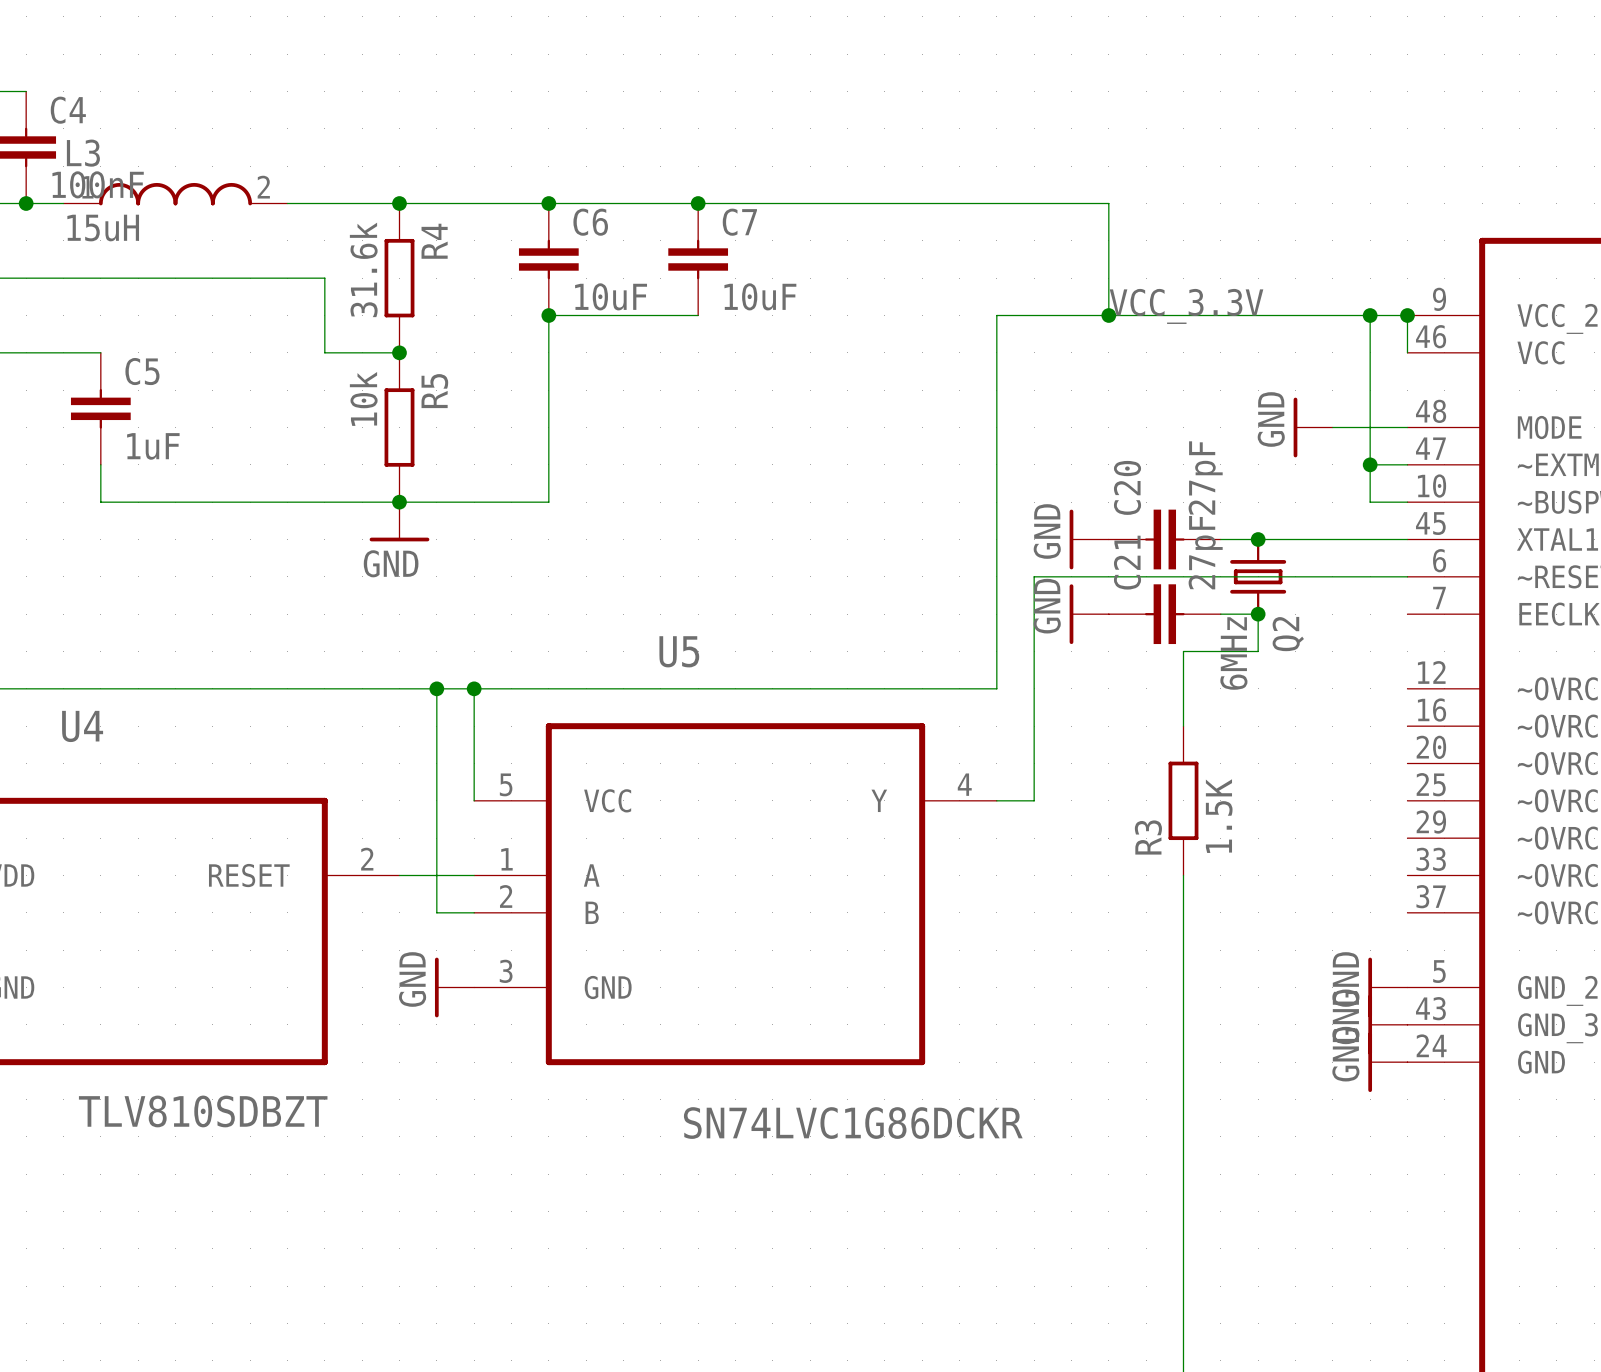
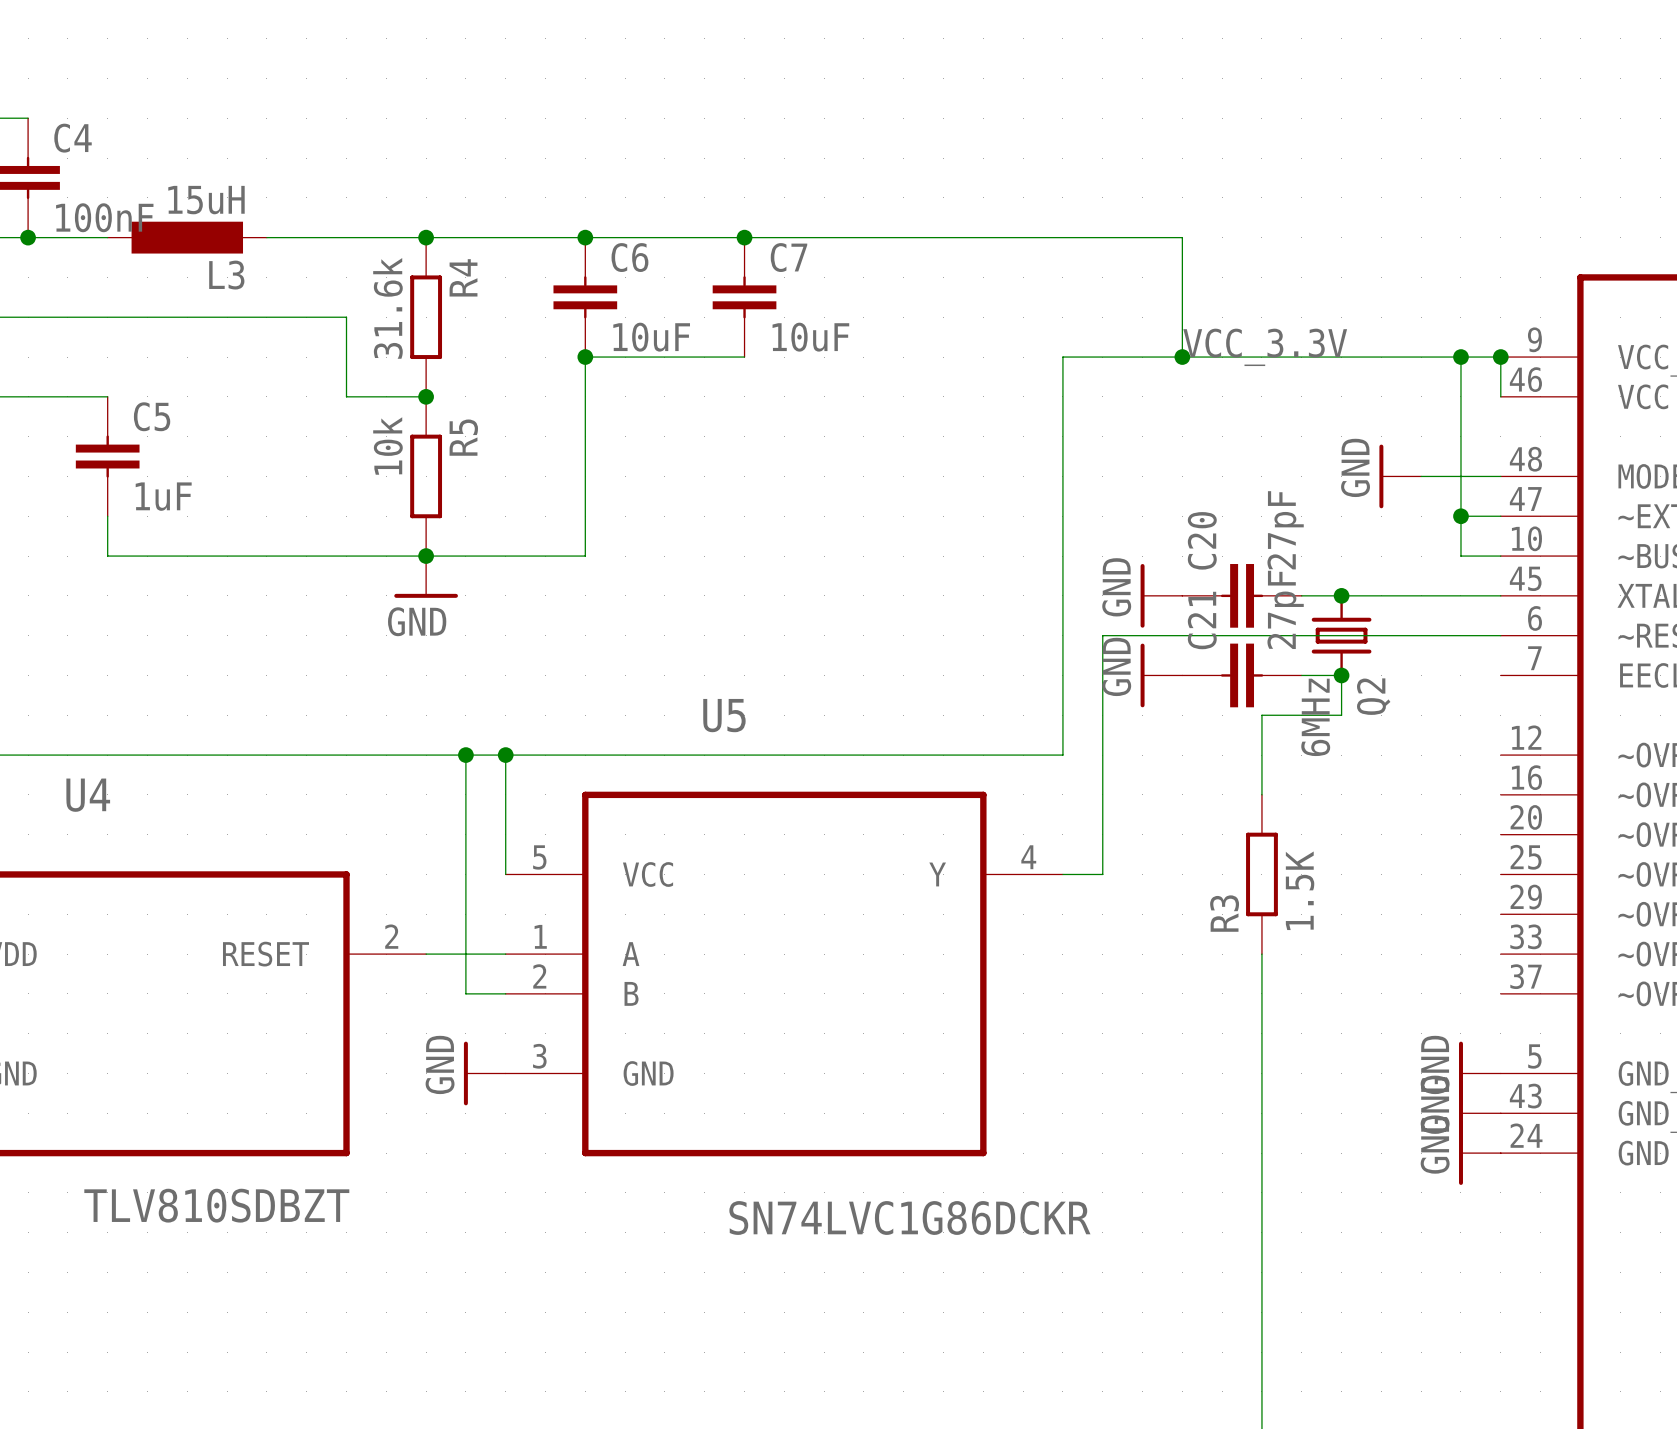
L3 name position: L3 (83, 153) -> L3 (226, 275)
L3 symbol: [63, 182, 288, 206] -> [107, 221, 267, 254]
L3 value position: 15uH (103, 228) -> 15uH (206, 200)

